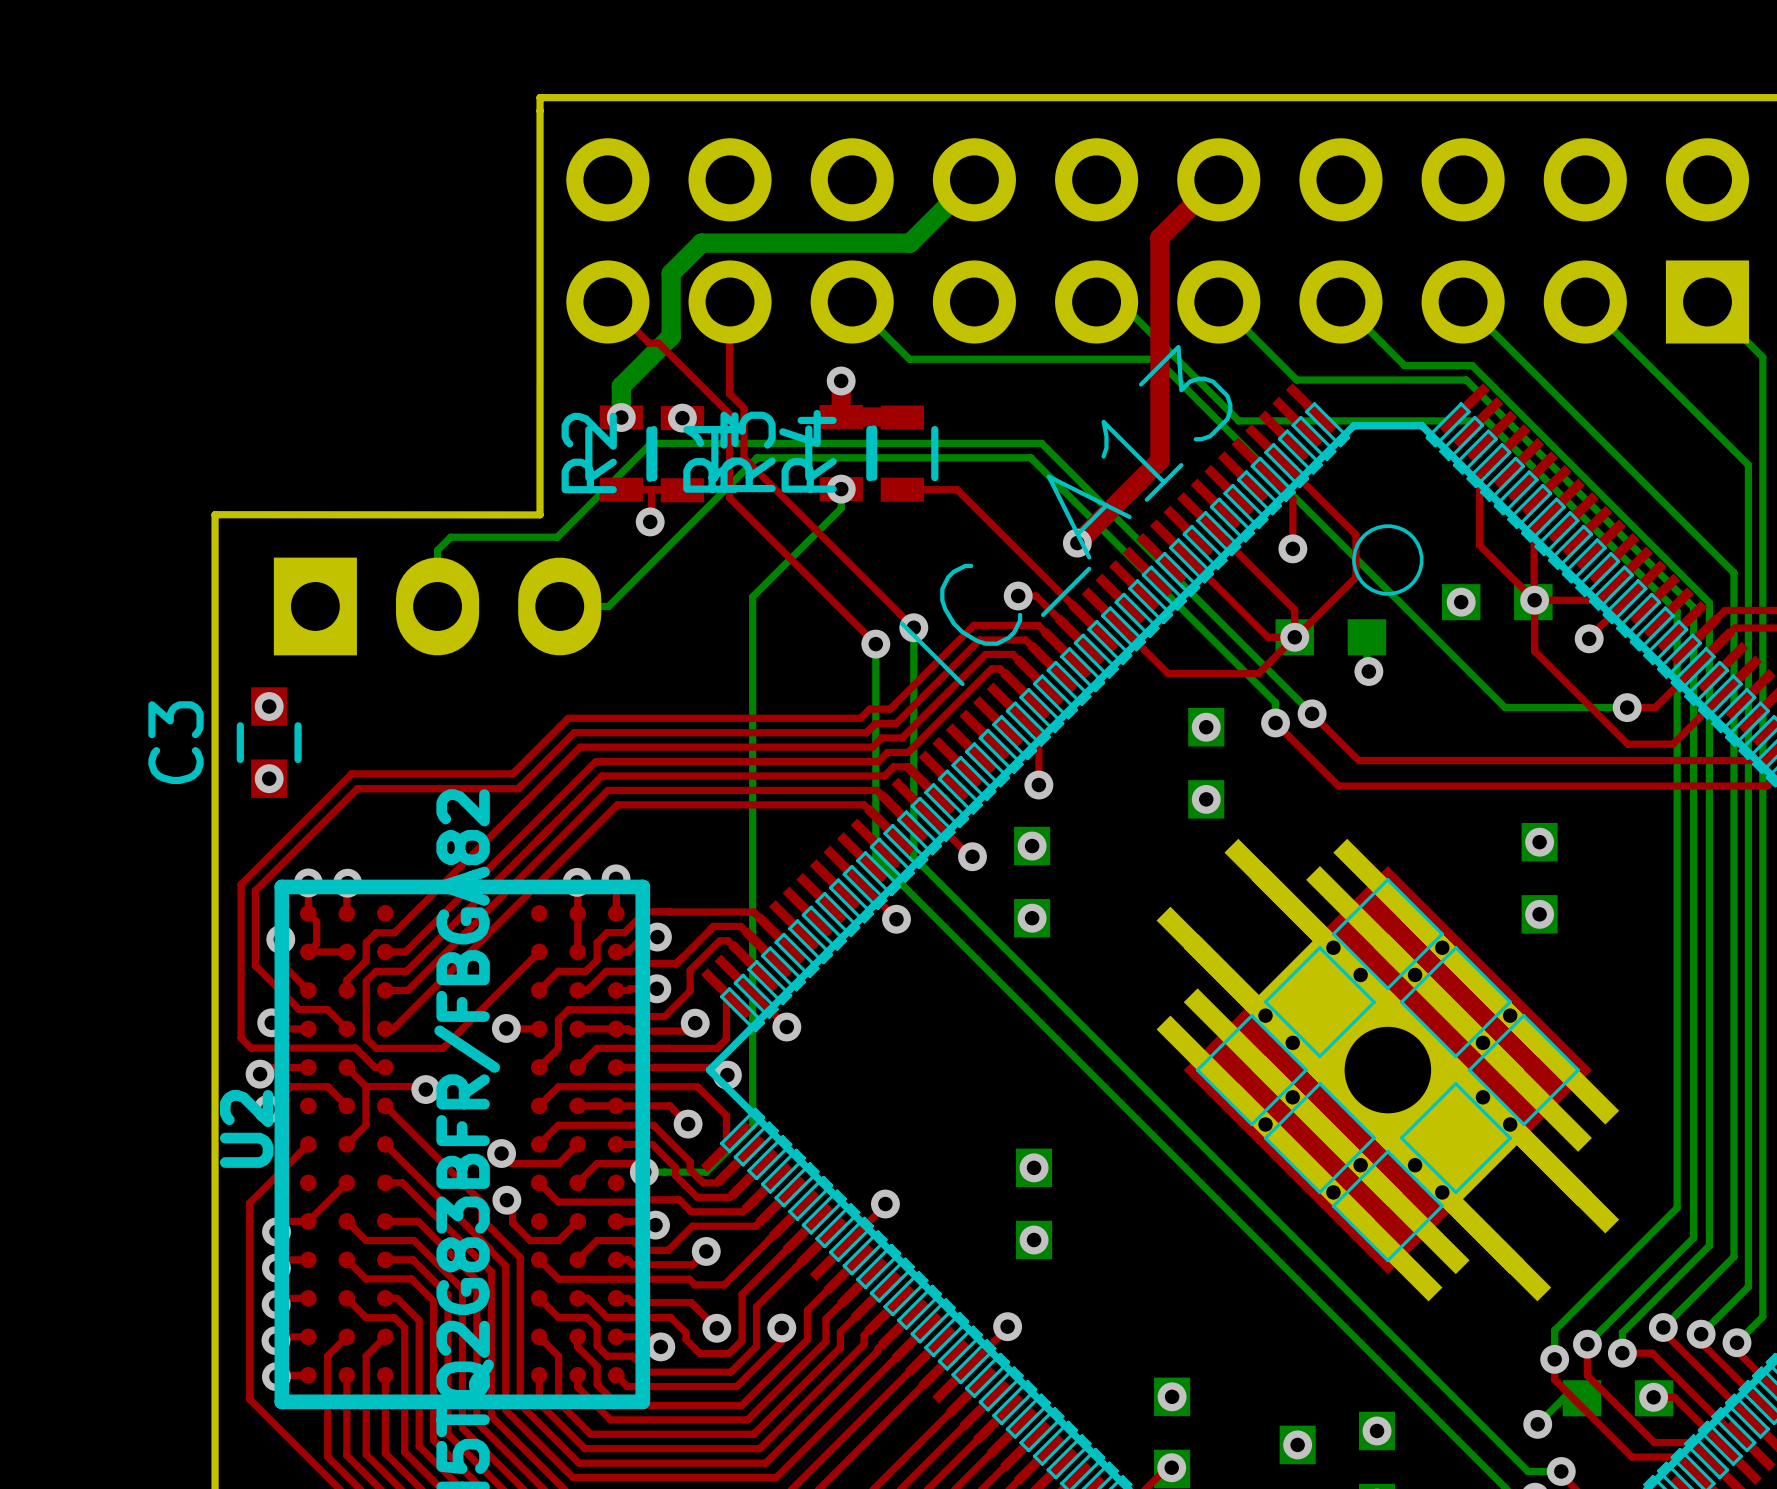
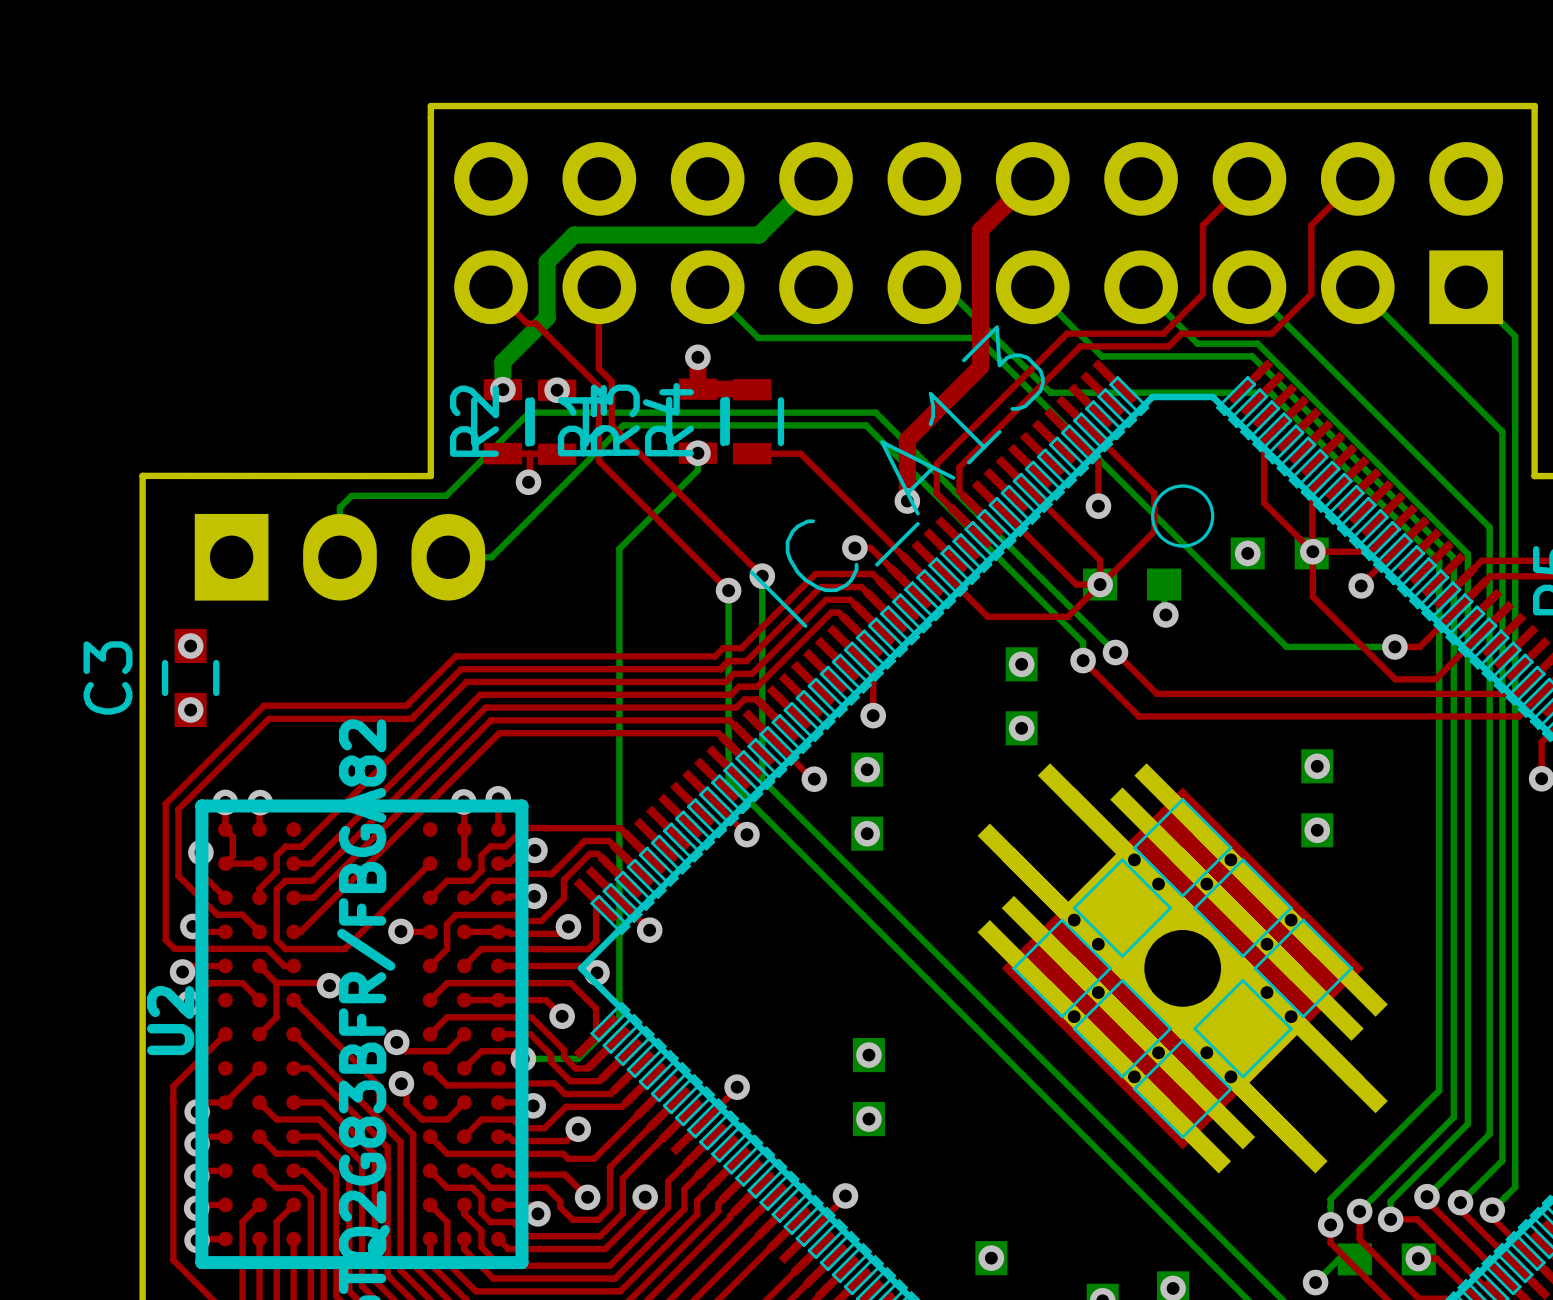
top track: none -> (1249, 178) (1202, 225) (1202, 294) (1163, 333) (1067, 333) (936, 463) (936, 493) (970, 526)
top track: none -> (1357, 178) (1311, 225) (1311, 294) (1271, 333) (1181, 333) (1168, 346) (1080, 346) (959, 467) (959, 491) (982, 514)
top track: (1159, 391) (1159, 460) (1077, 543) -> (980, 366) (907, 440) (907, 501)

